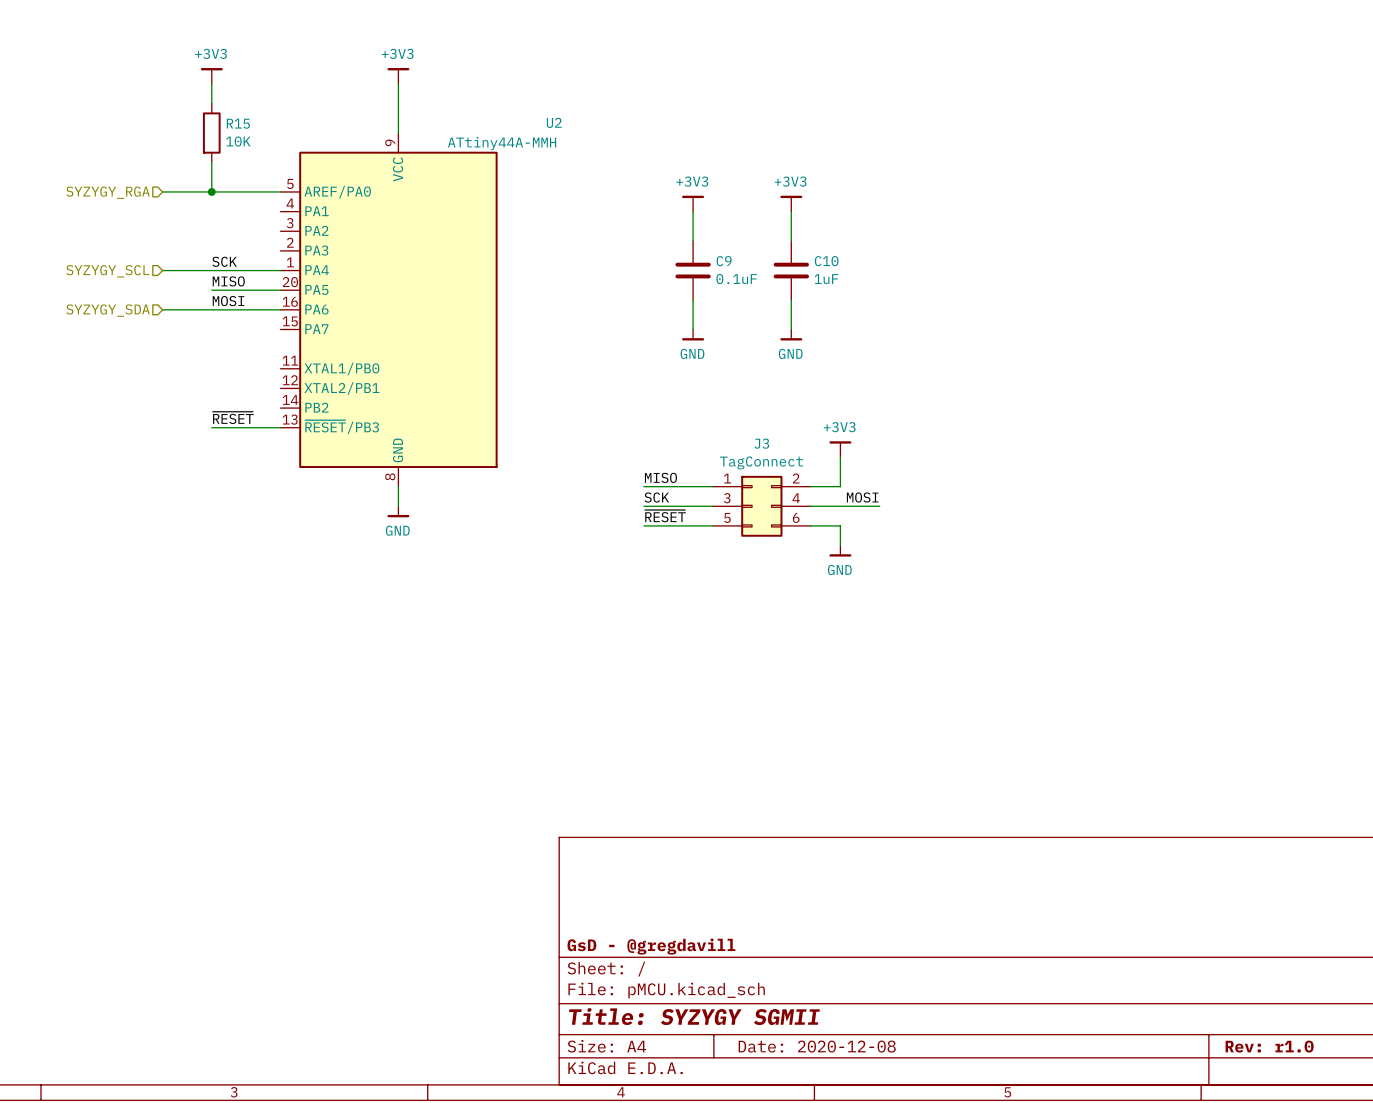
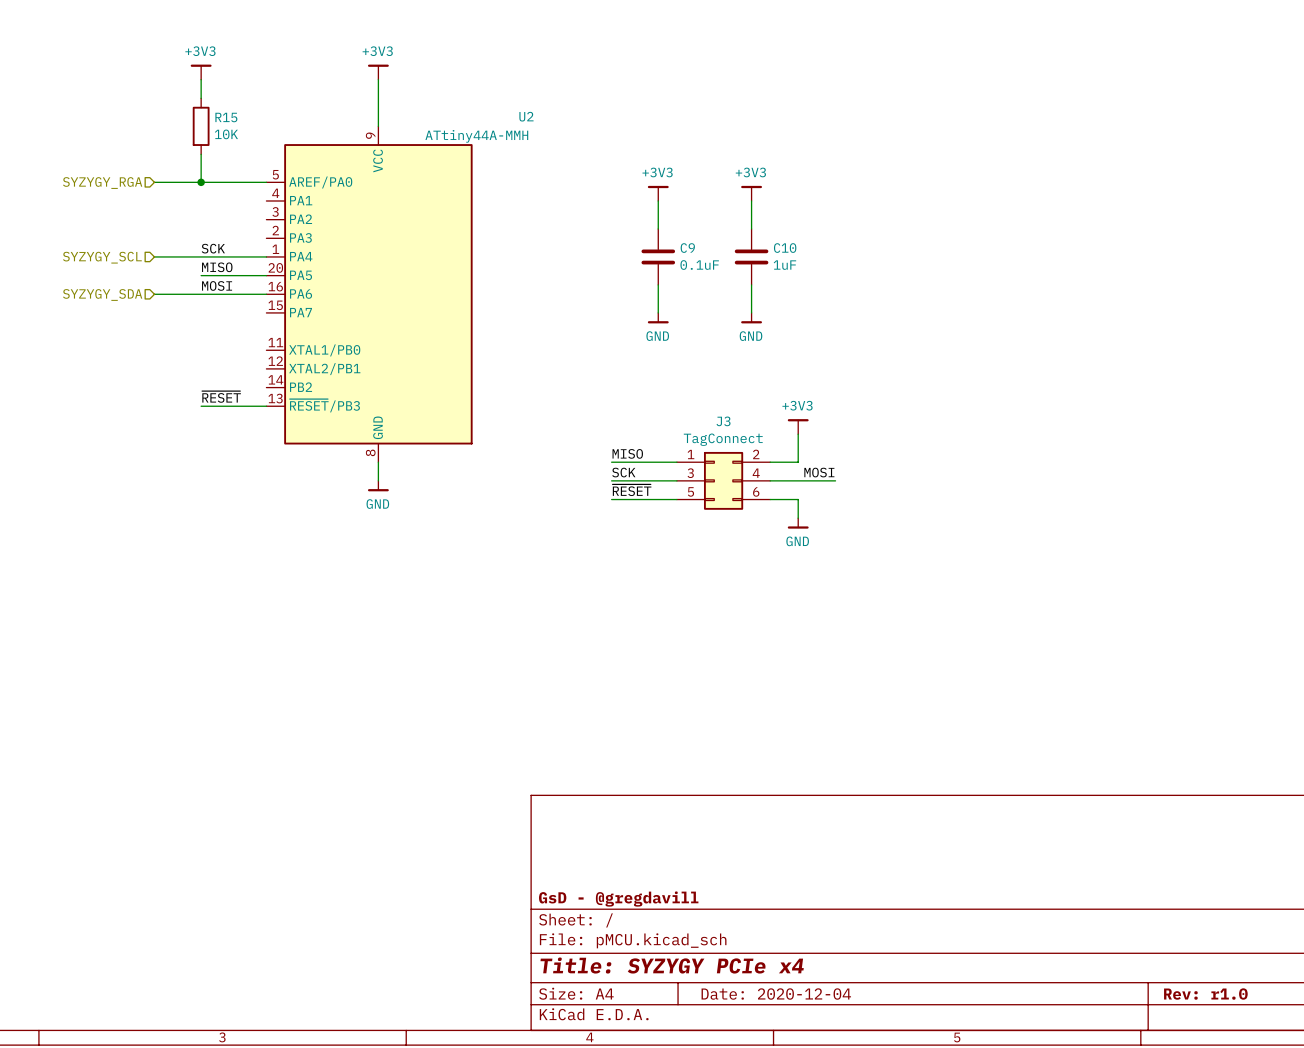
title block: Title: SYZYGY SGMII (694, 1016) -> Title: SYZYGY PCIe x4 (672, 965)
title block: Date: 2020-12-08 (817, 1046) -> Date: 2020-12-04 (776, 994)

